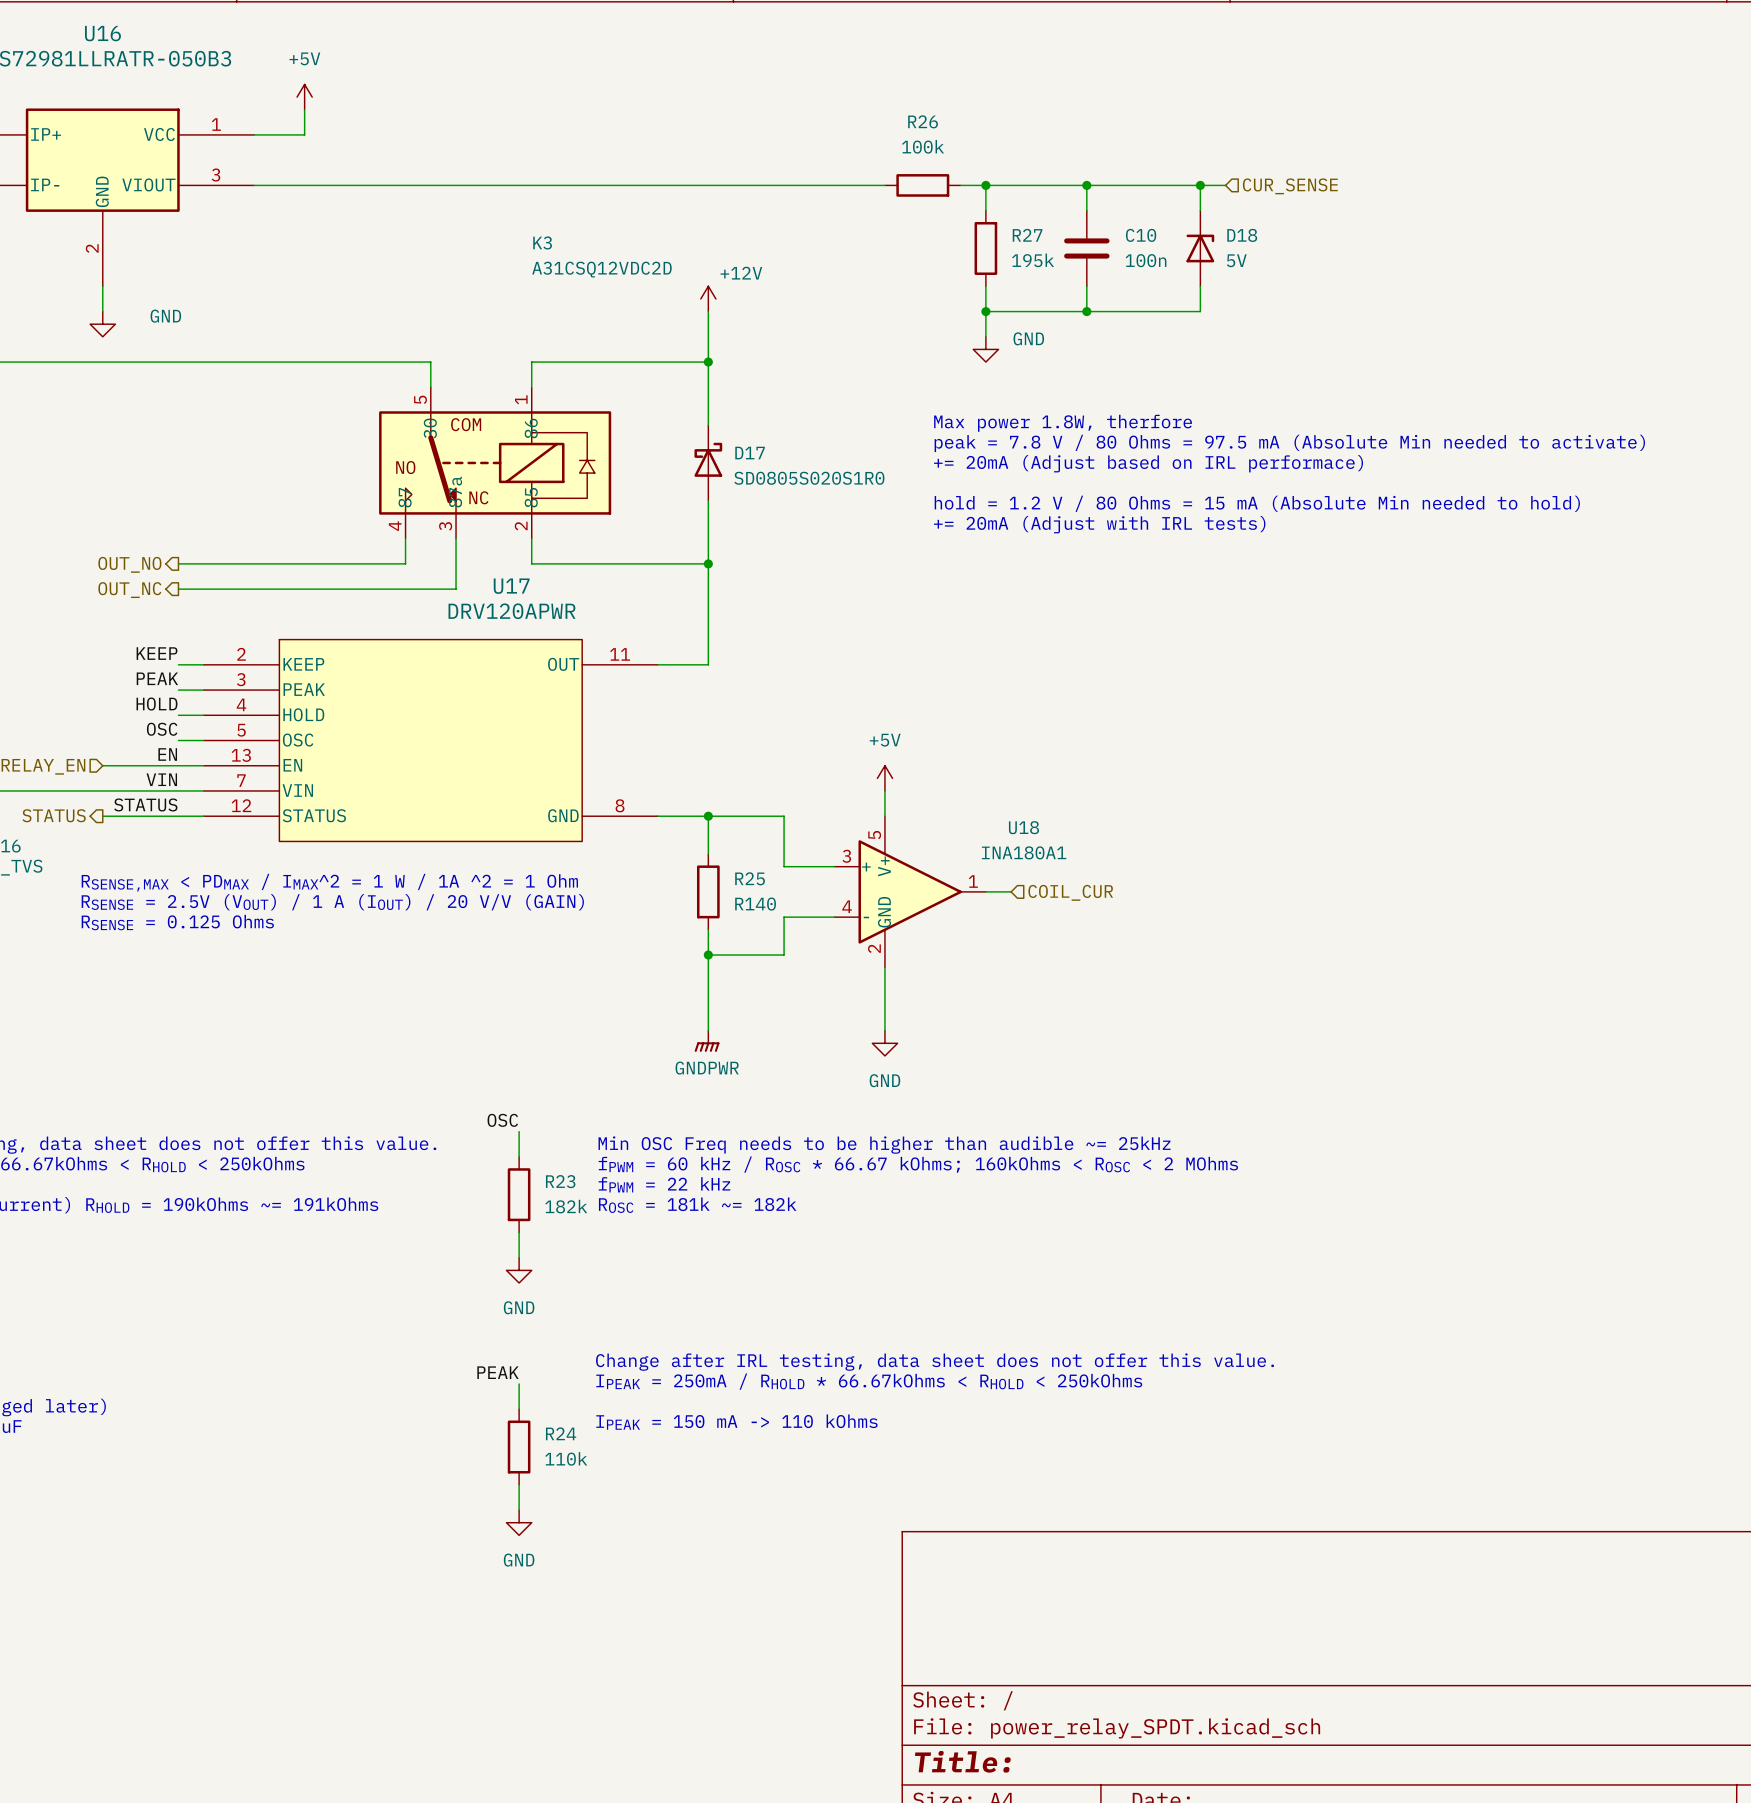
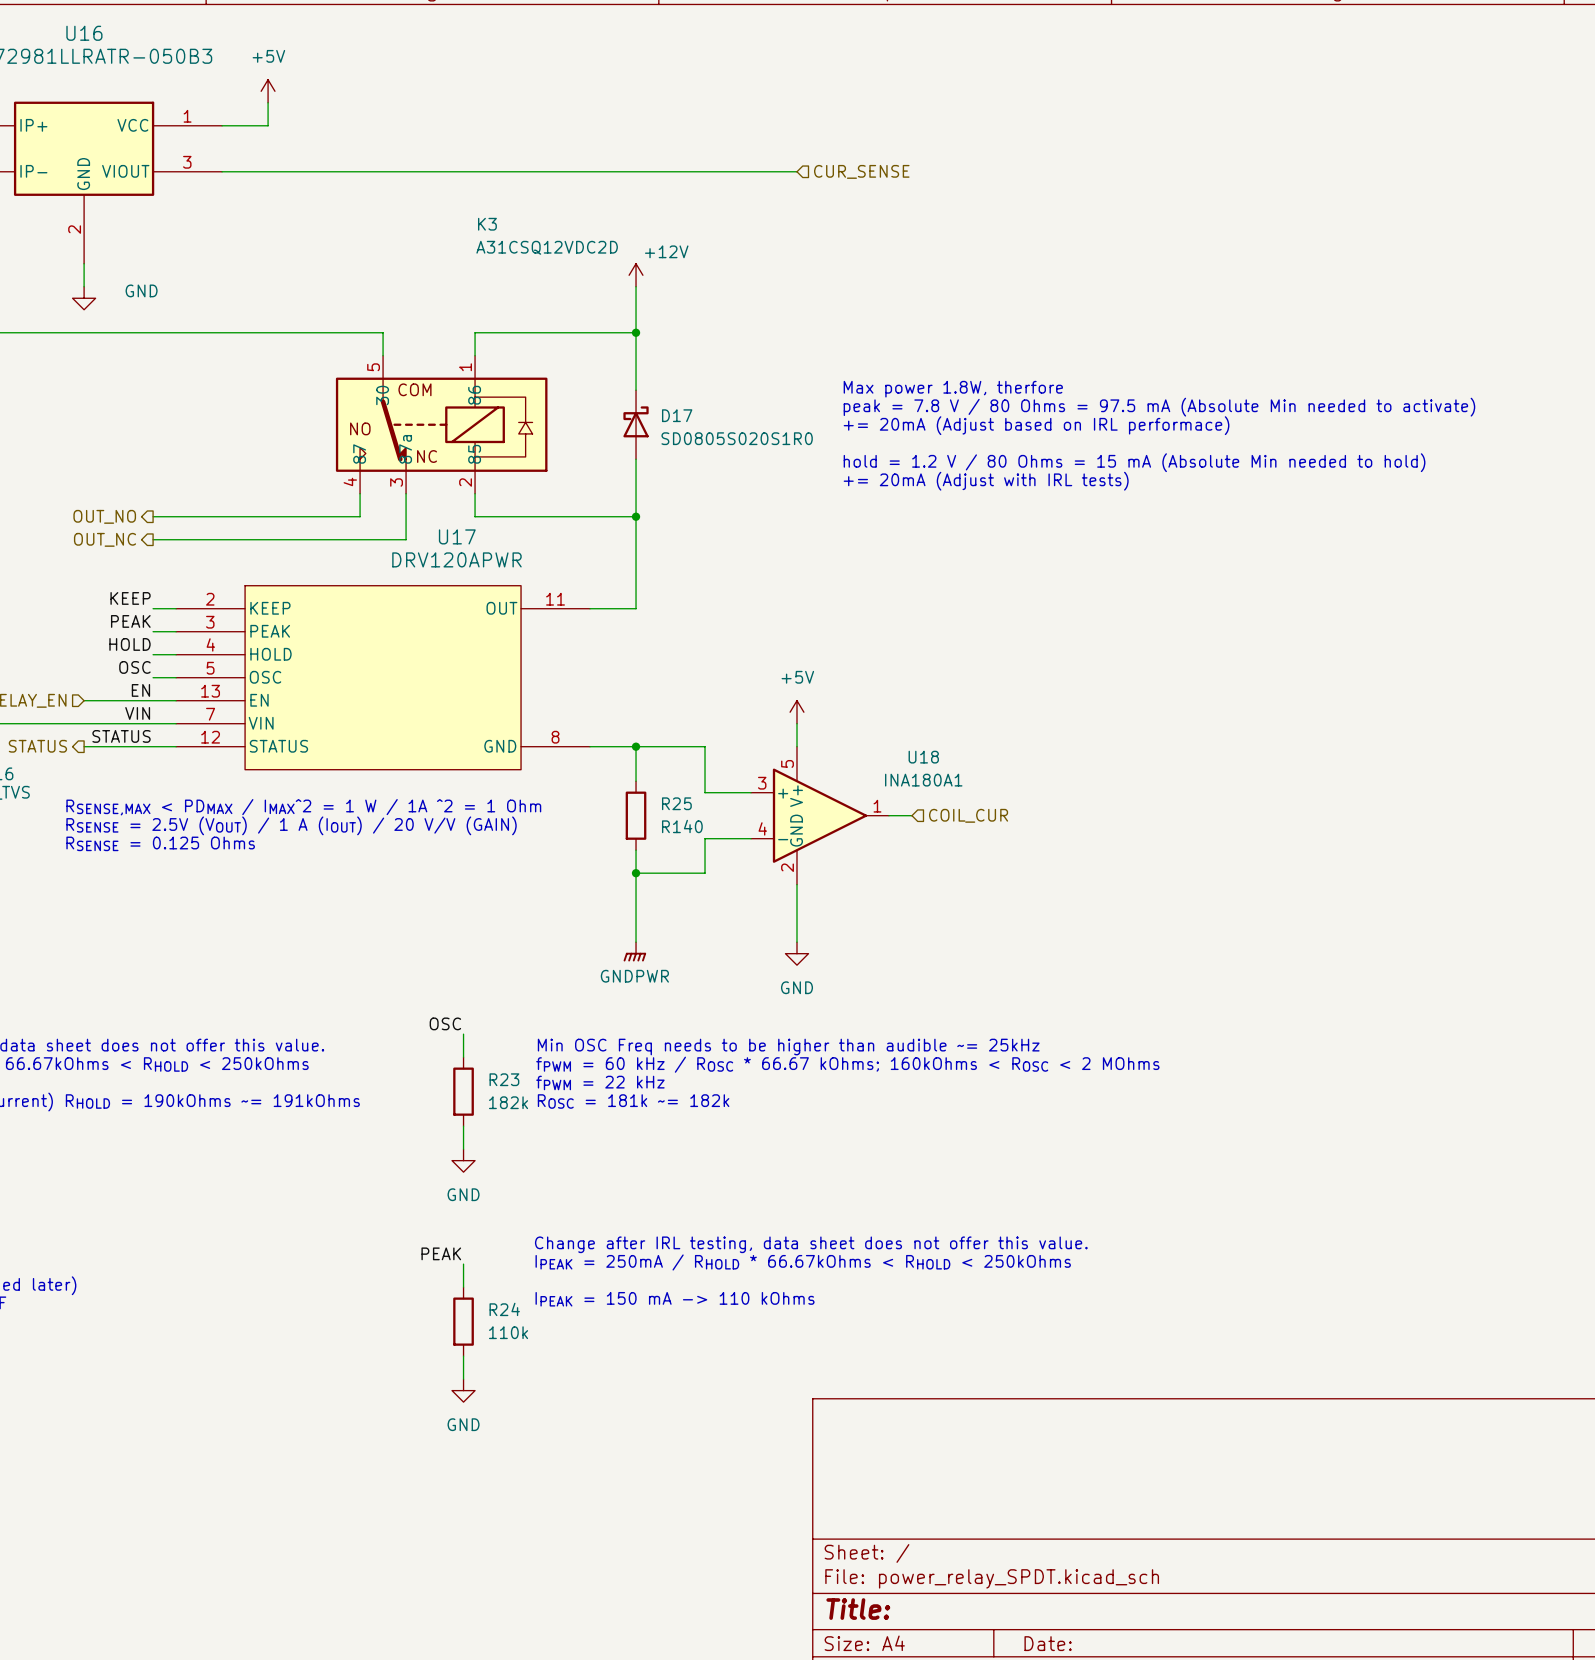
R26: 100k (922, 185) -> none
wire: (960, 185) (1225, 185) -> none
wire: (985, 185) (985, 210) -> none
junction: (985, 185) -> none
wire: (1086, 185) (1086, 210) -> none
junction: (1086, 185) -> none
wire: (1200, 185) (1200, 210) -> none
junction: (1200, 185) -> none
hierarchical label: none -> CUR_SENSE (861, 171)
hierarchical label: CUR_SENSE (1290, 186) -> none
R27: 195k (985, 248) -> none
C10: 100n (1086, 248) -> none
D18: 5V (1200, 248) -> none
wire: (985, 286) (985, 336) -> none
wire: (1086, 286) (1086, 311) -> none
wire: (1200, 286) (1200, 311) (985, 311) -> none
junction: (985, 311) -> none
junction: (1086, 311) -> none
power symbol: GND (985, 349) -> none

